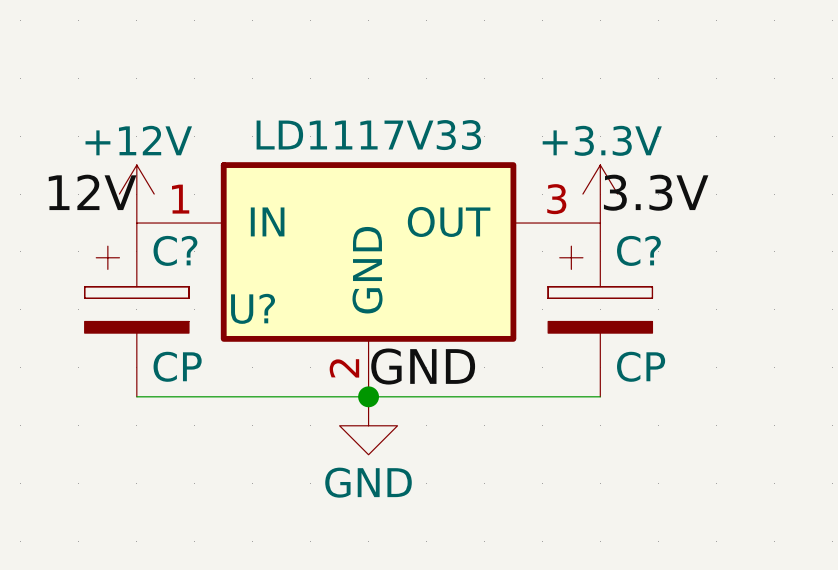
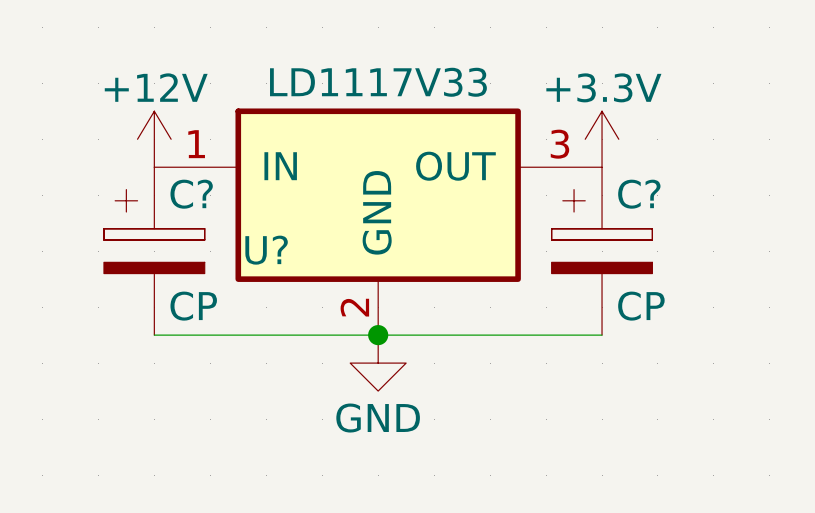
label: 12V (92, 192) -> none
label: 3.3V (656, 192) -> none
label: GND (423, 366) -> none

